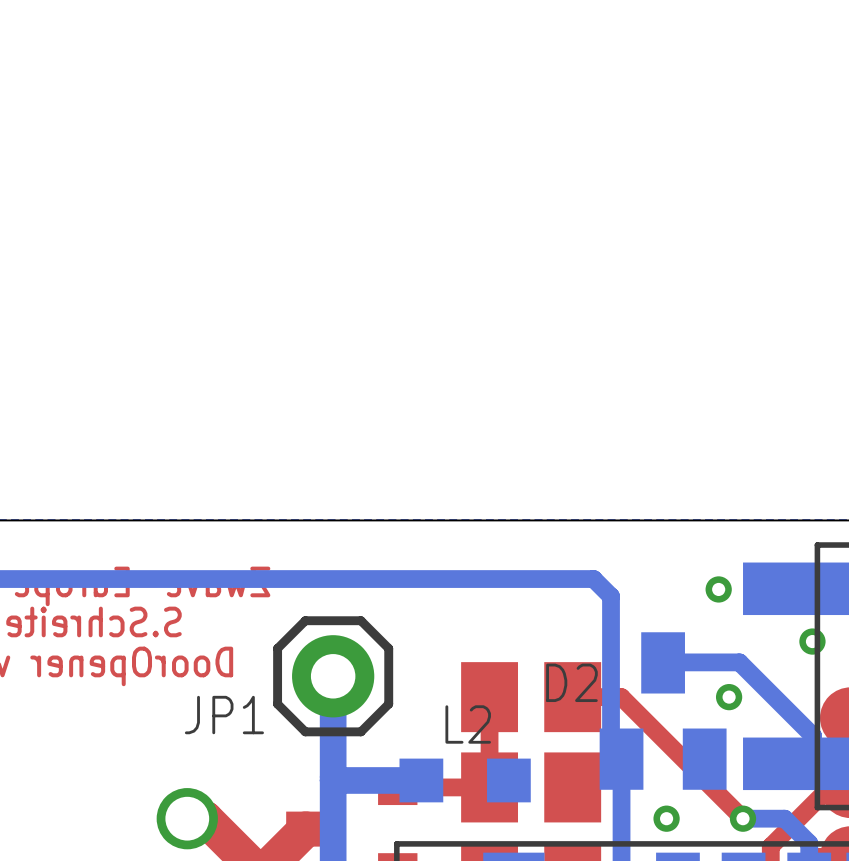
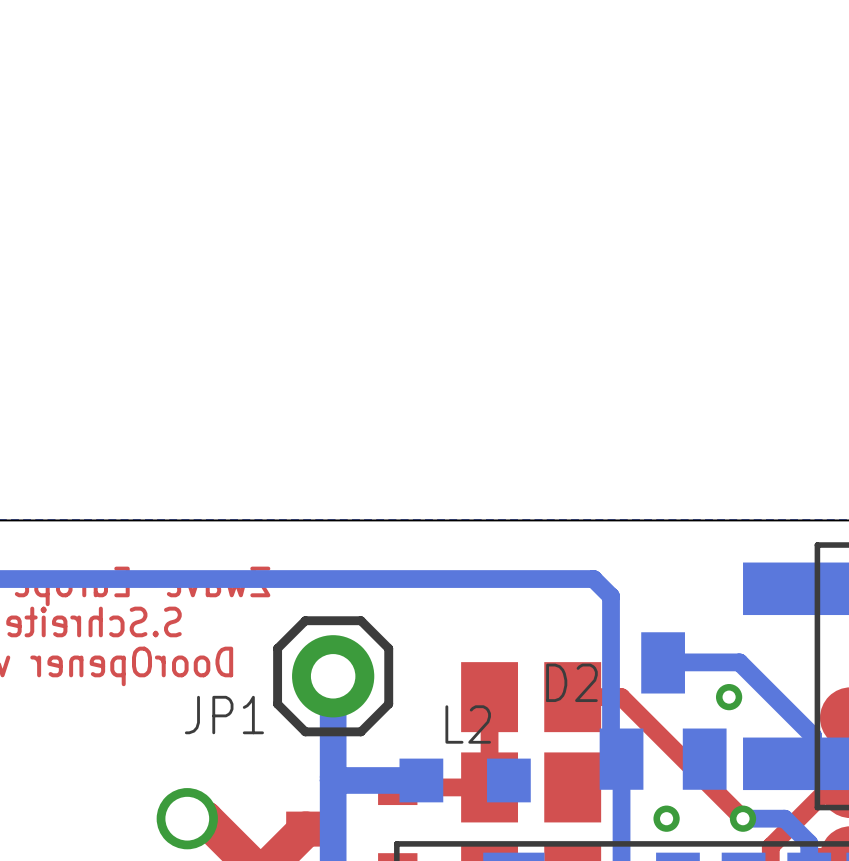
via: (718, 589) -> none
via: (812, 641) -> none

